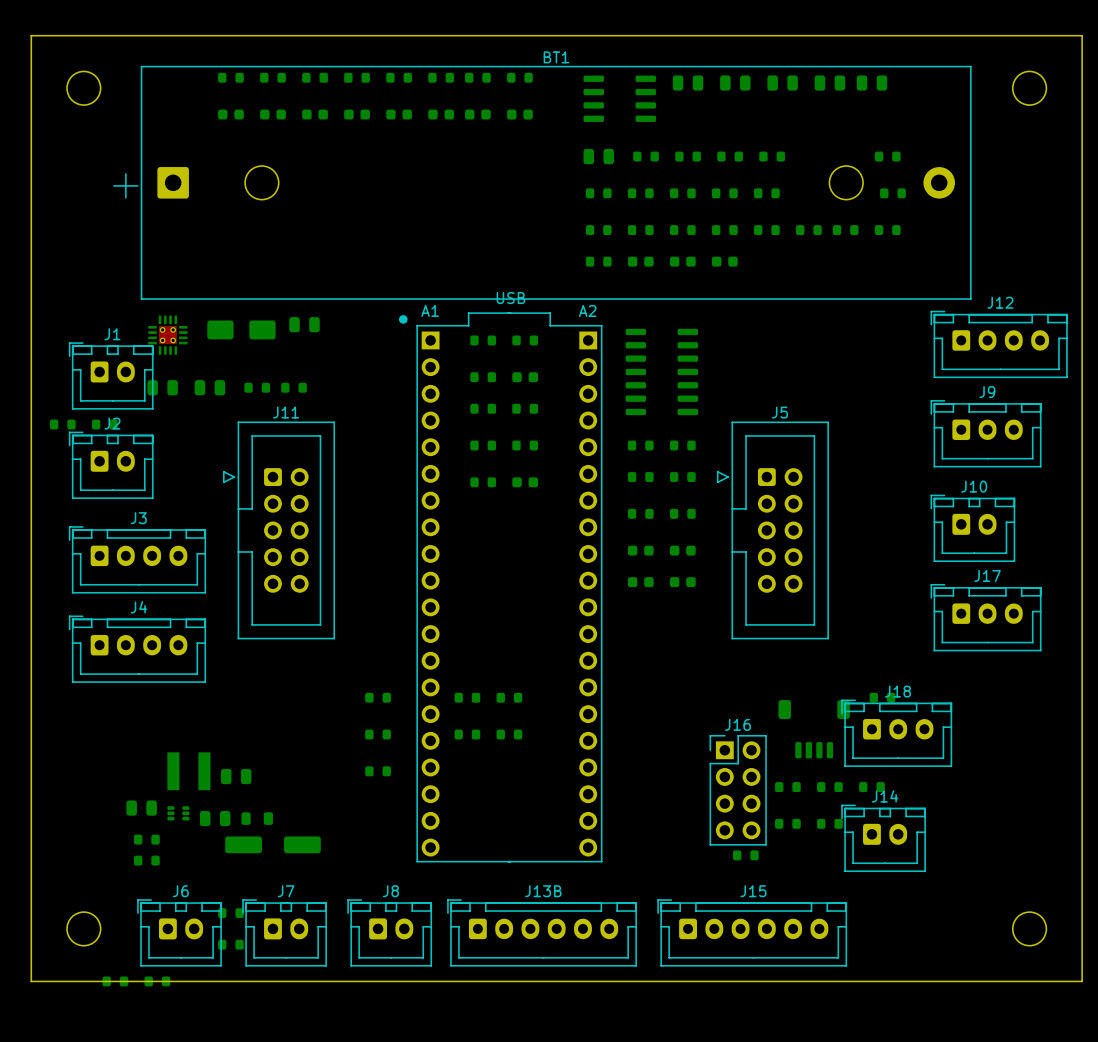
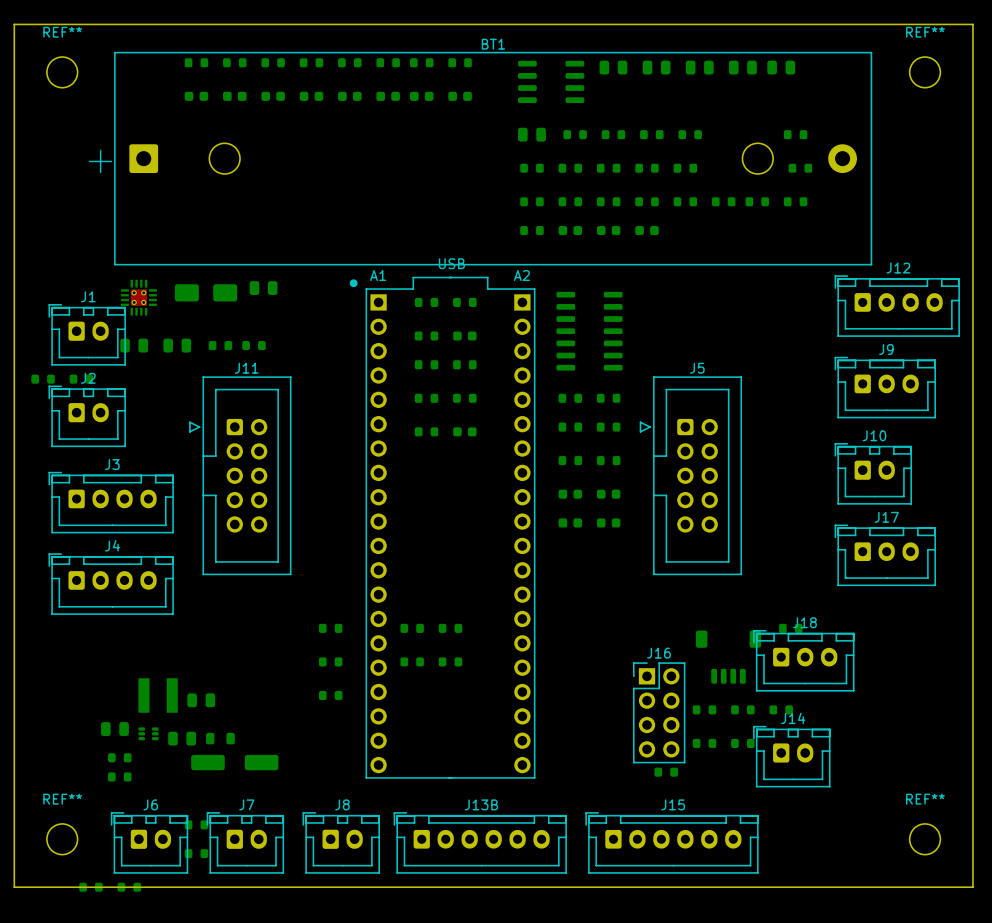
REF** name: none -> REF** (62, 32)
REF** name: none -> REF** (925, 32)
REF** name: none -> REF** (62, 799)
REF** name: none -> REF** (925, 799)

